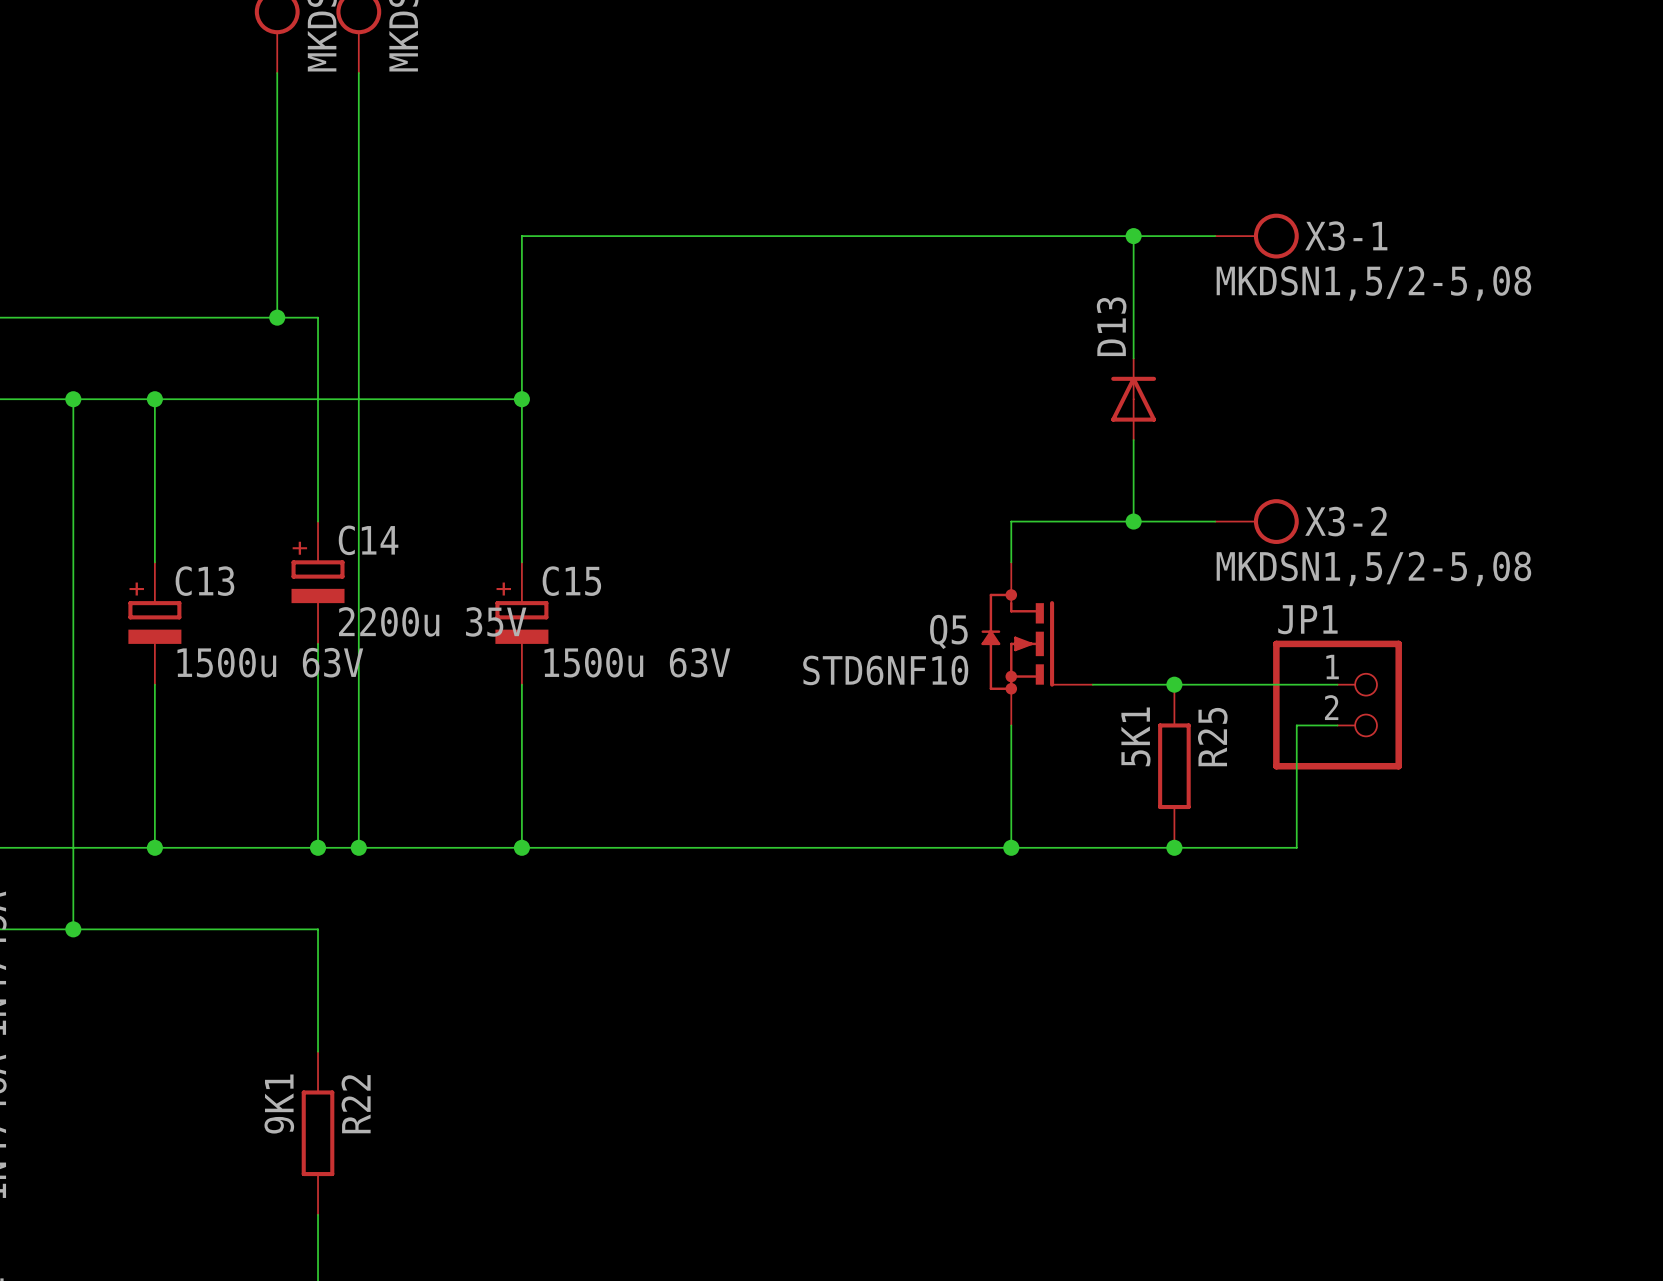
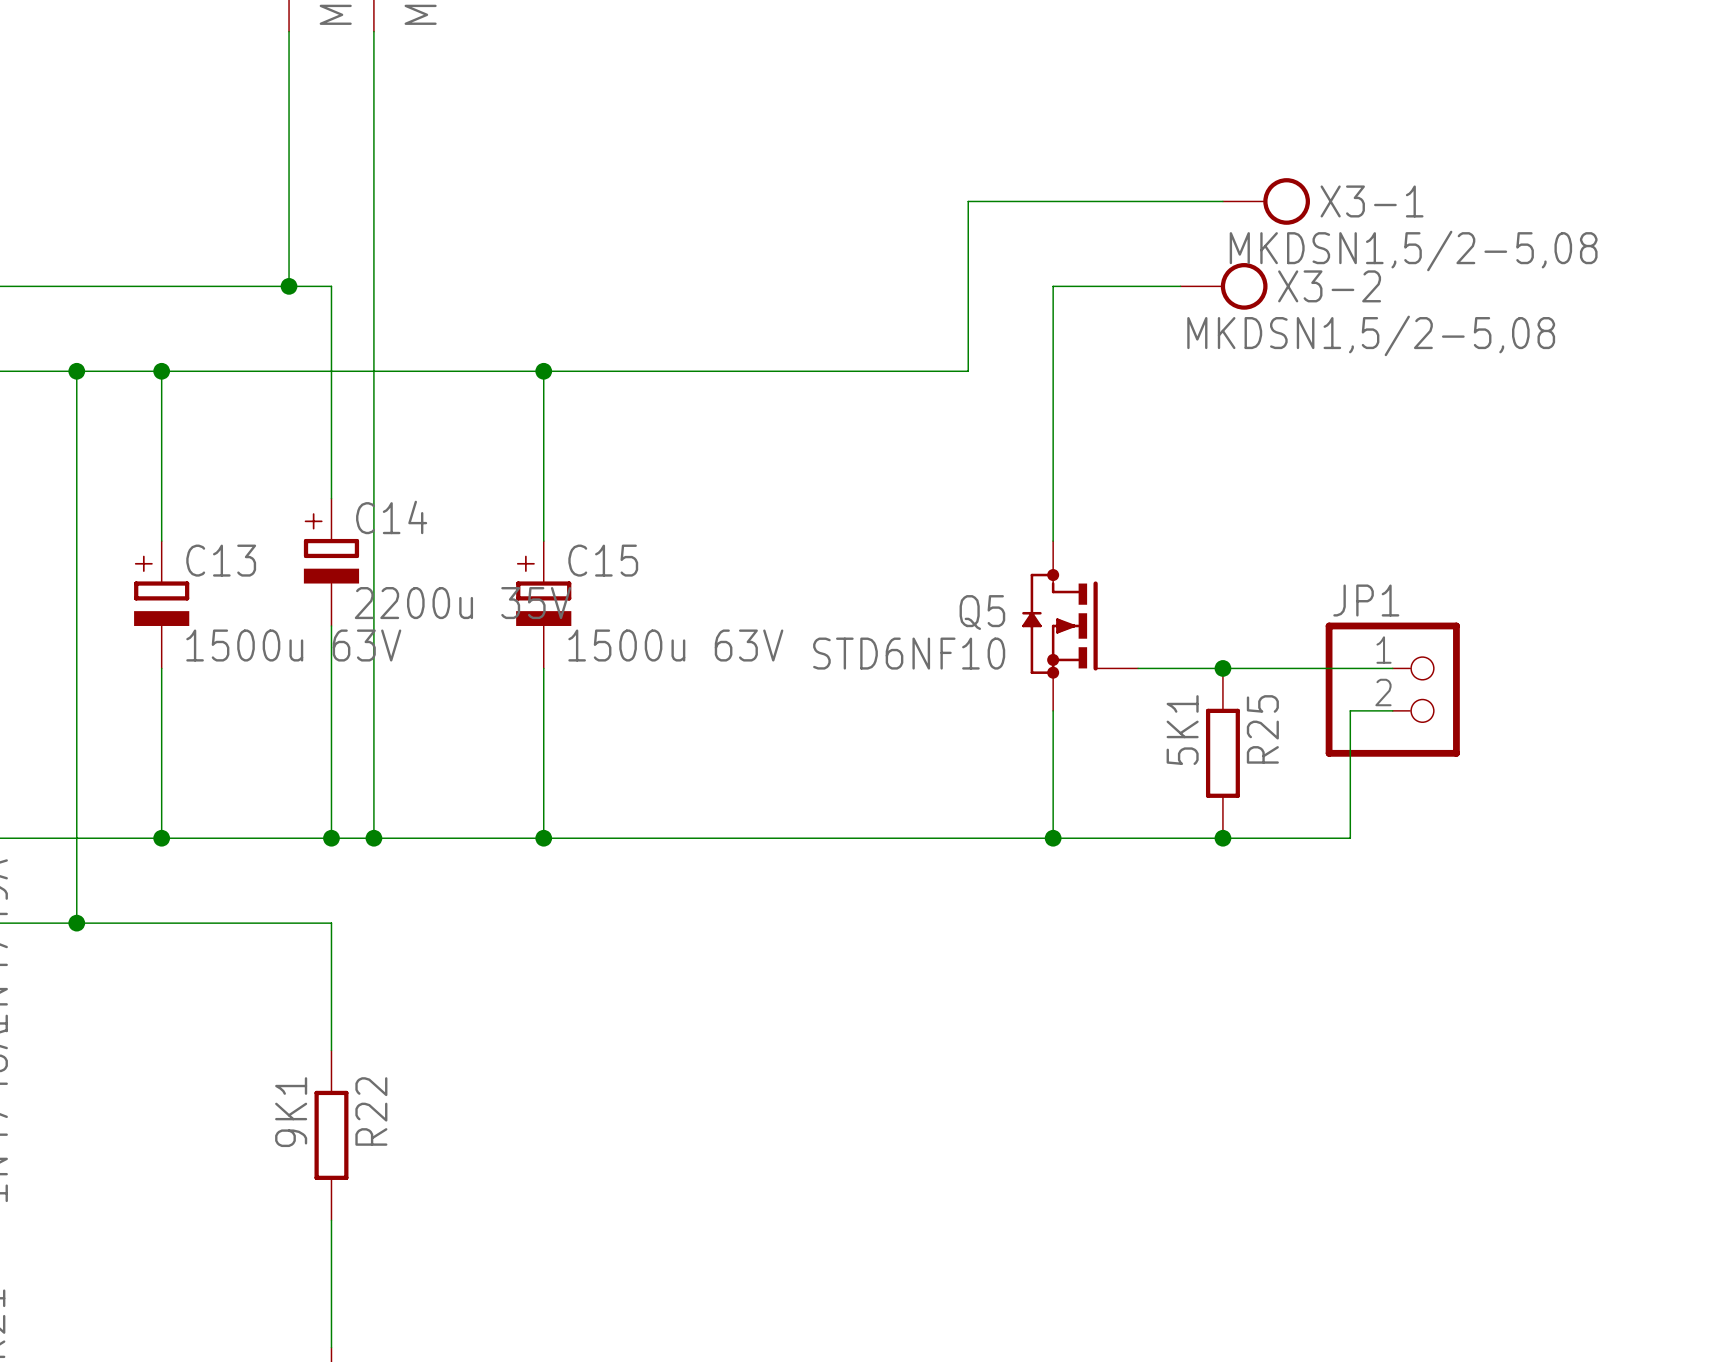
wire: (929, 236) (521, 236) (521, 399) -> (968, 201) (968, 371) (543, 371)
wire: (1133, 236) (1133, 358) -> none
junction: (1133, 236) -> none
X3-1 position: (1256, 236) -> (1266, 201)
D13: (1133, 399) -> none
wire: (1133, 440) (1133, 521) -> none
wire: (1011, 521) (1215, 521) -> (1053, 498) (1053, 286) (1180, 286)
junction: (1133, 521) -> none
X3-2 position: (1256, 521) -> (1224, 286)

